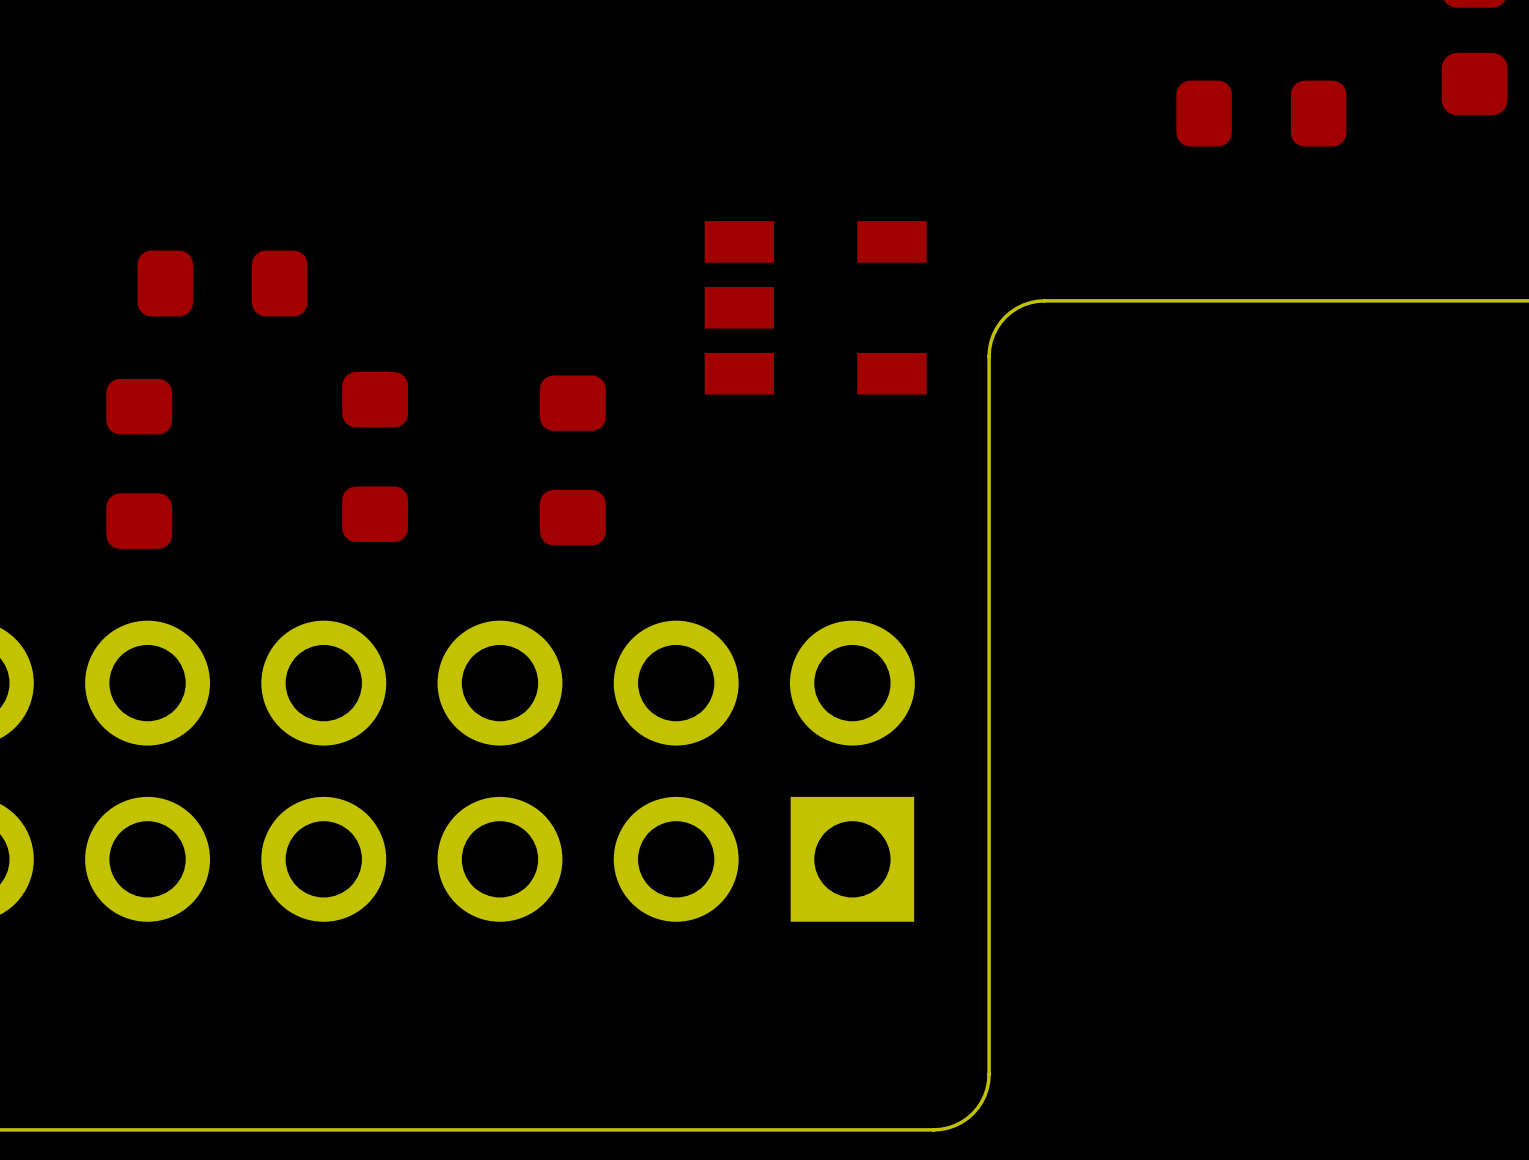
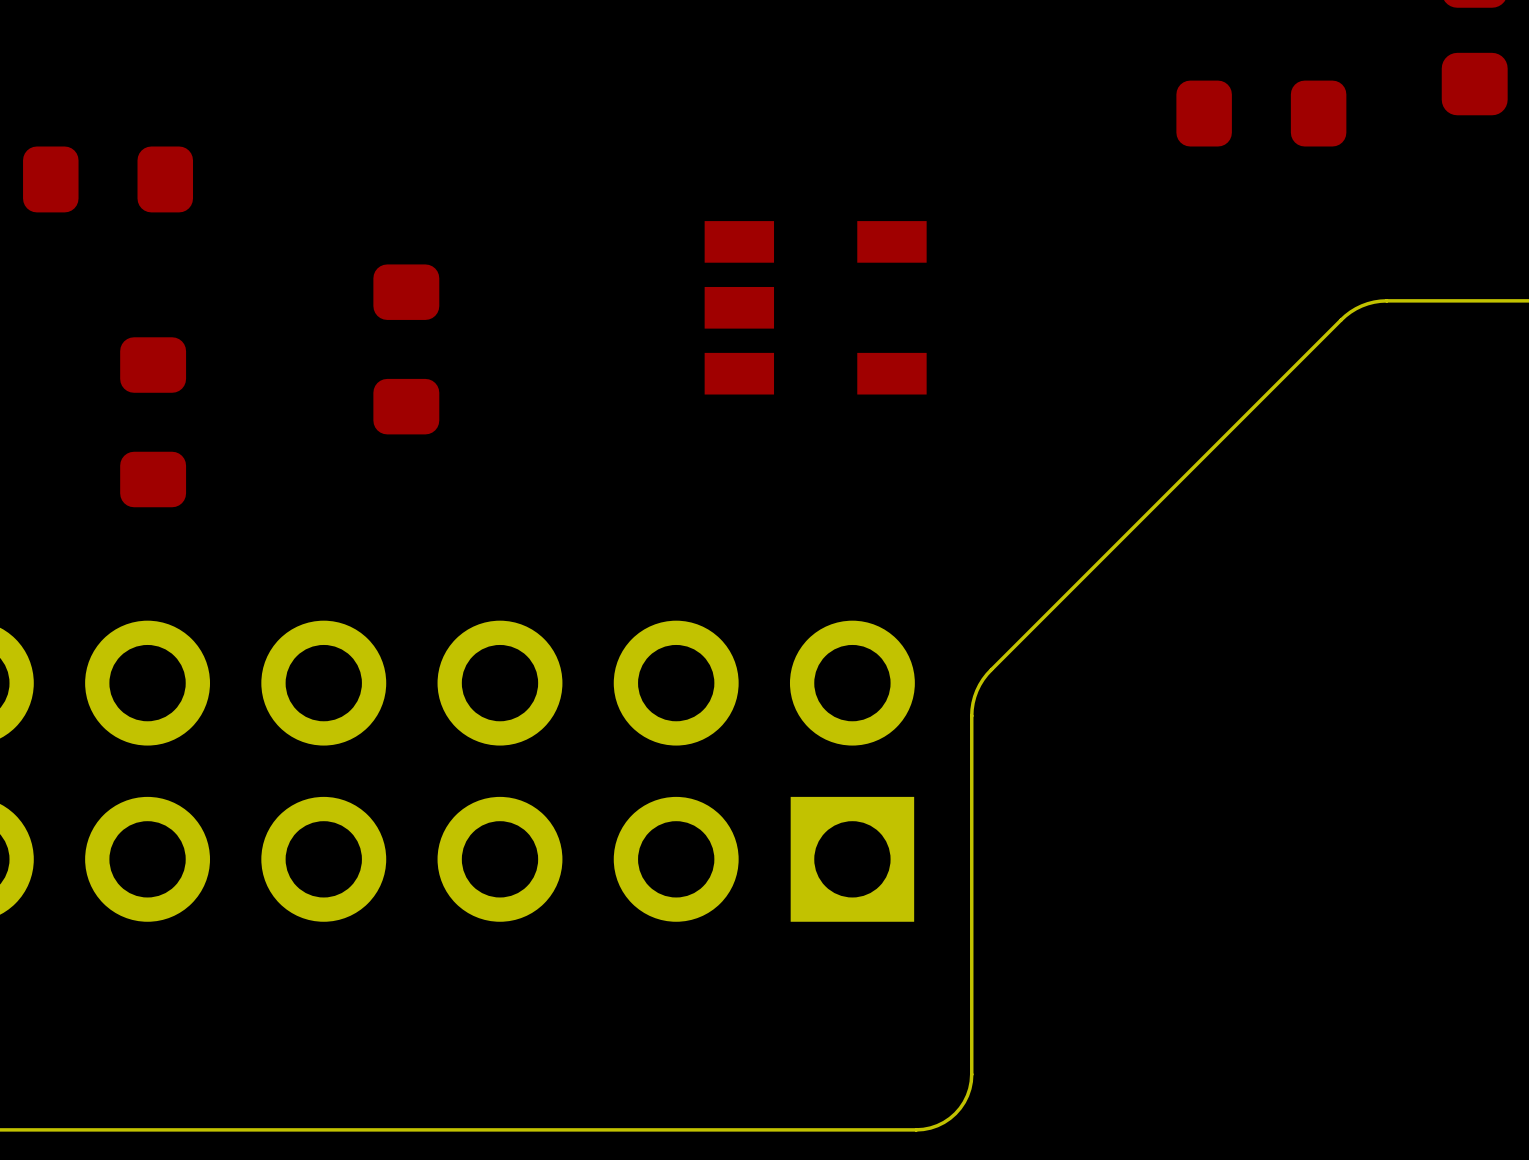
part: none -> (108, 179)
part: (222, 283) -> none
board edge: (1386, 300) (1037, 301) (1016, 308) (1005, 317) (996, 328) (990, 342) (989, 356) (988, 1081) (981, 1102) (972, 1113) (961, 1122) (940, 1129) (916, 1129) -> (1386, 300) (1361, 305) (1340, 320) (991, 669) (979, 684) (974, 696) (971, 715) (971, 1081) (967, 1095) (955, 1113) (937, 1125) (916, 1129)
part: none -> (406, 349)
part: (375, 456) -> none
part: (572, 460) -> none
part position: (139, 463) -> (153, 422)

